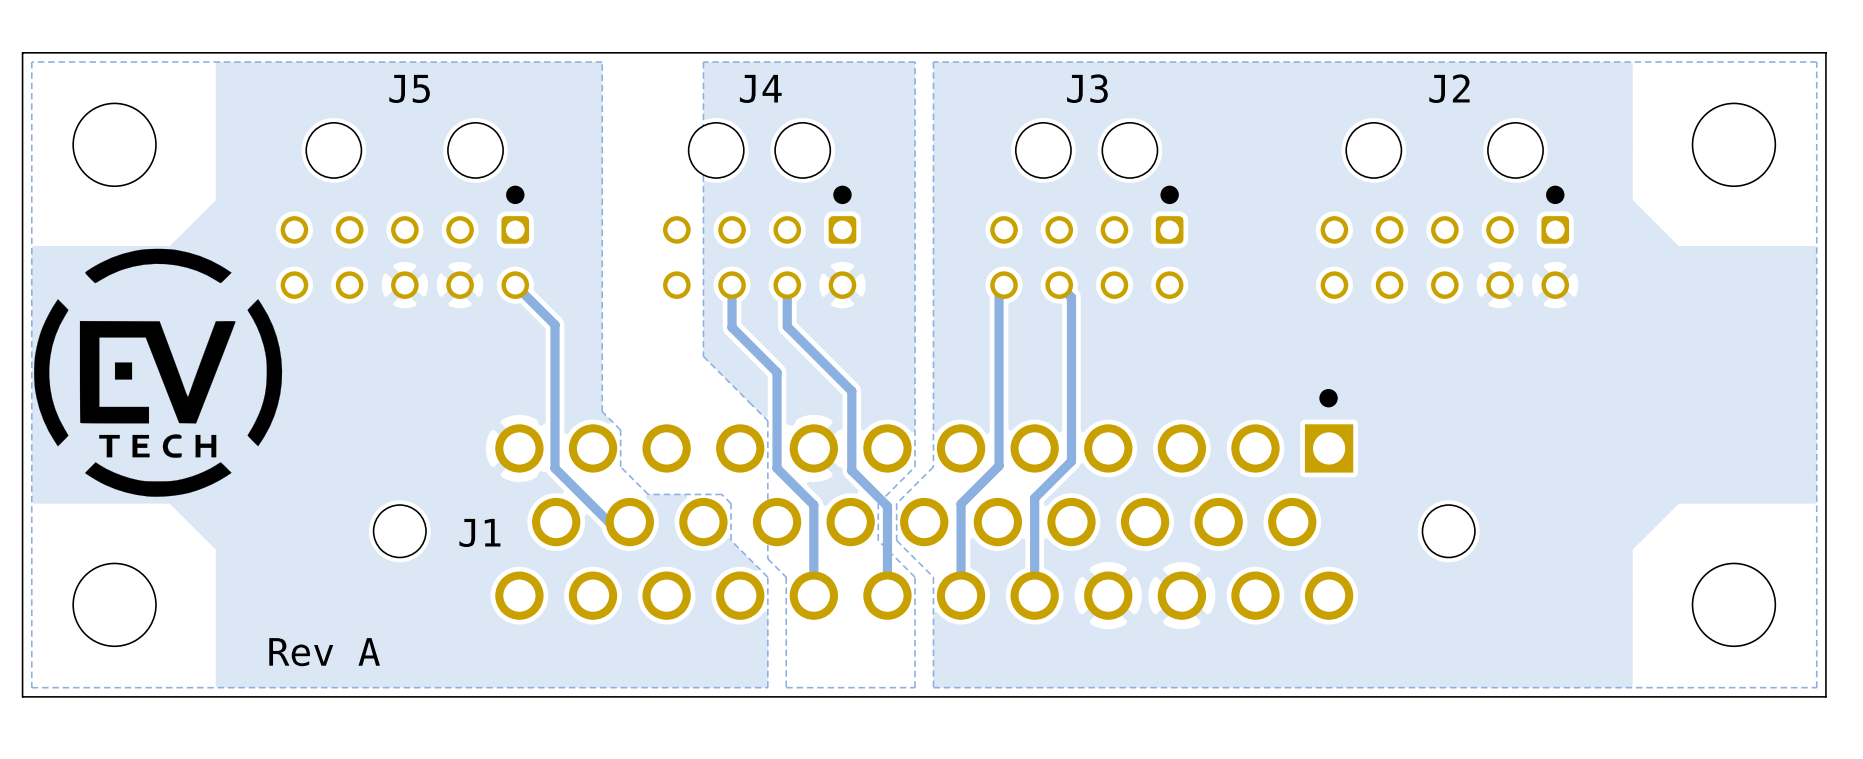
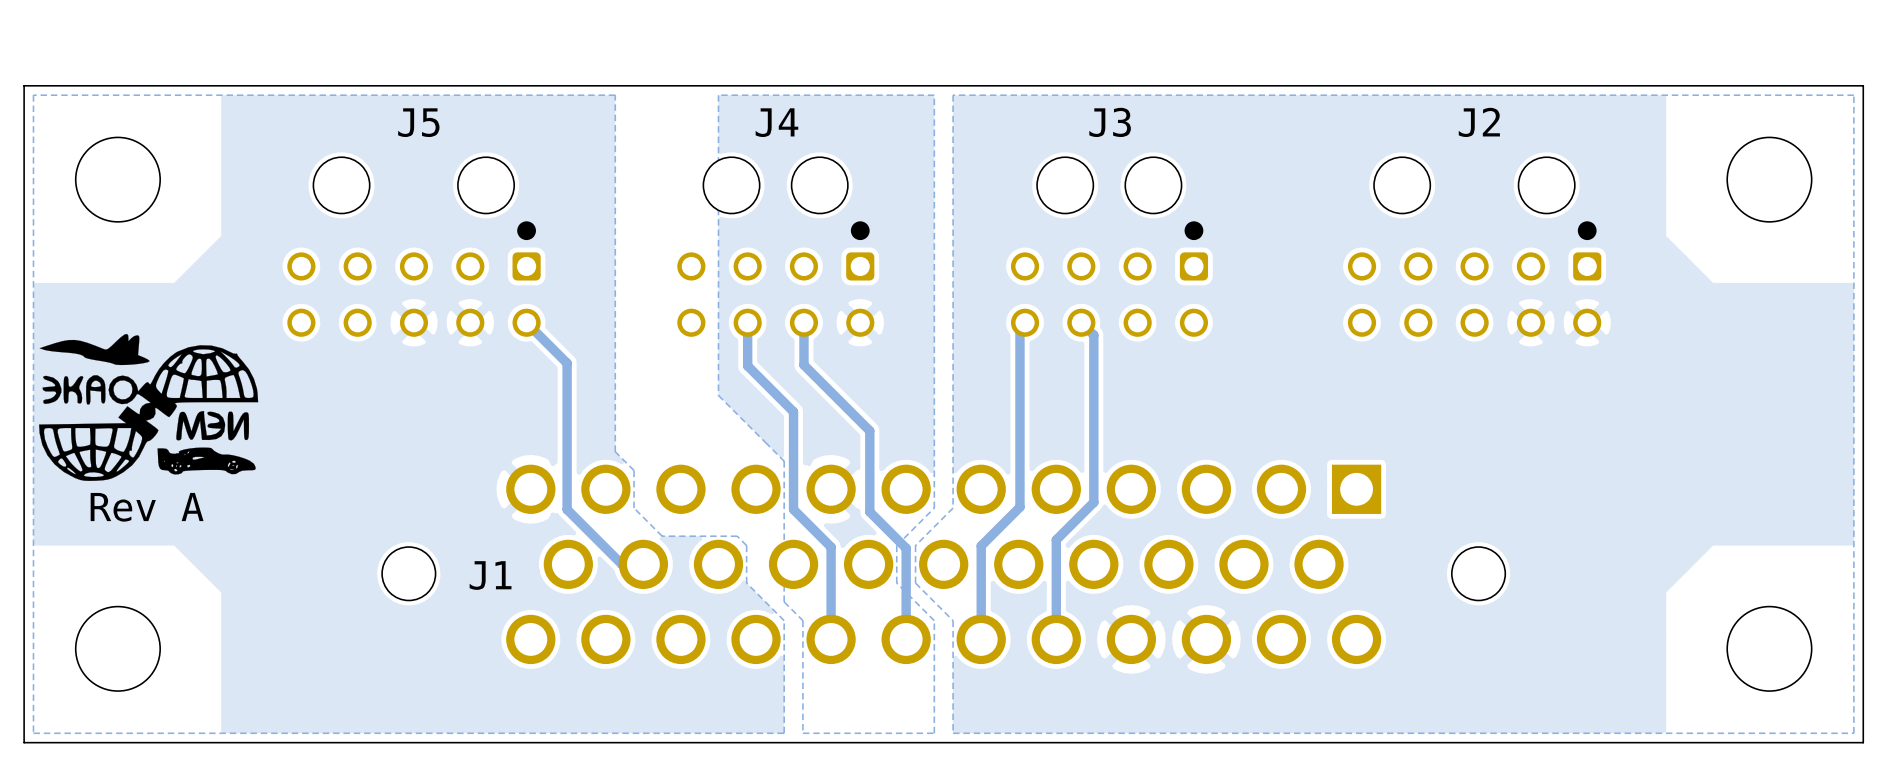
drawing shape: [34, 248, 283, 497] -> [39, 333, 259, 481]
drawing: [1319, 388, 1338, 408] -> none
text position: Rev A (324, 652) -> Rev A (147, 507)

